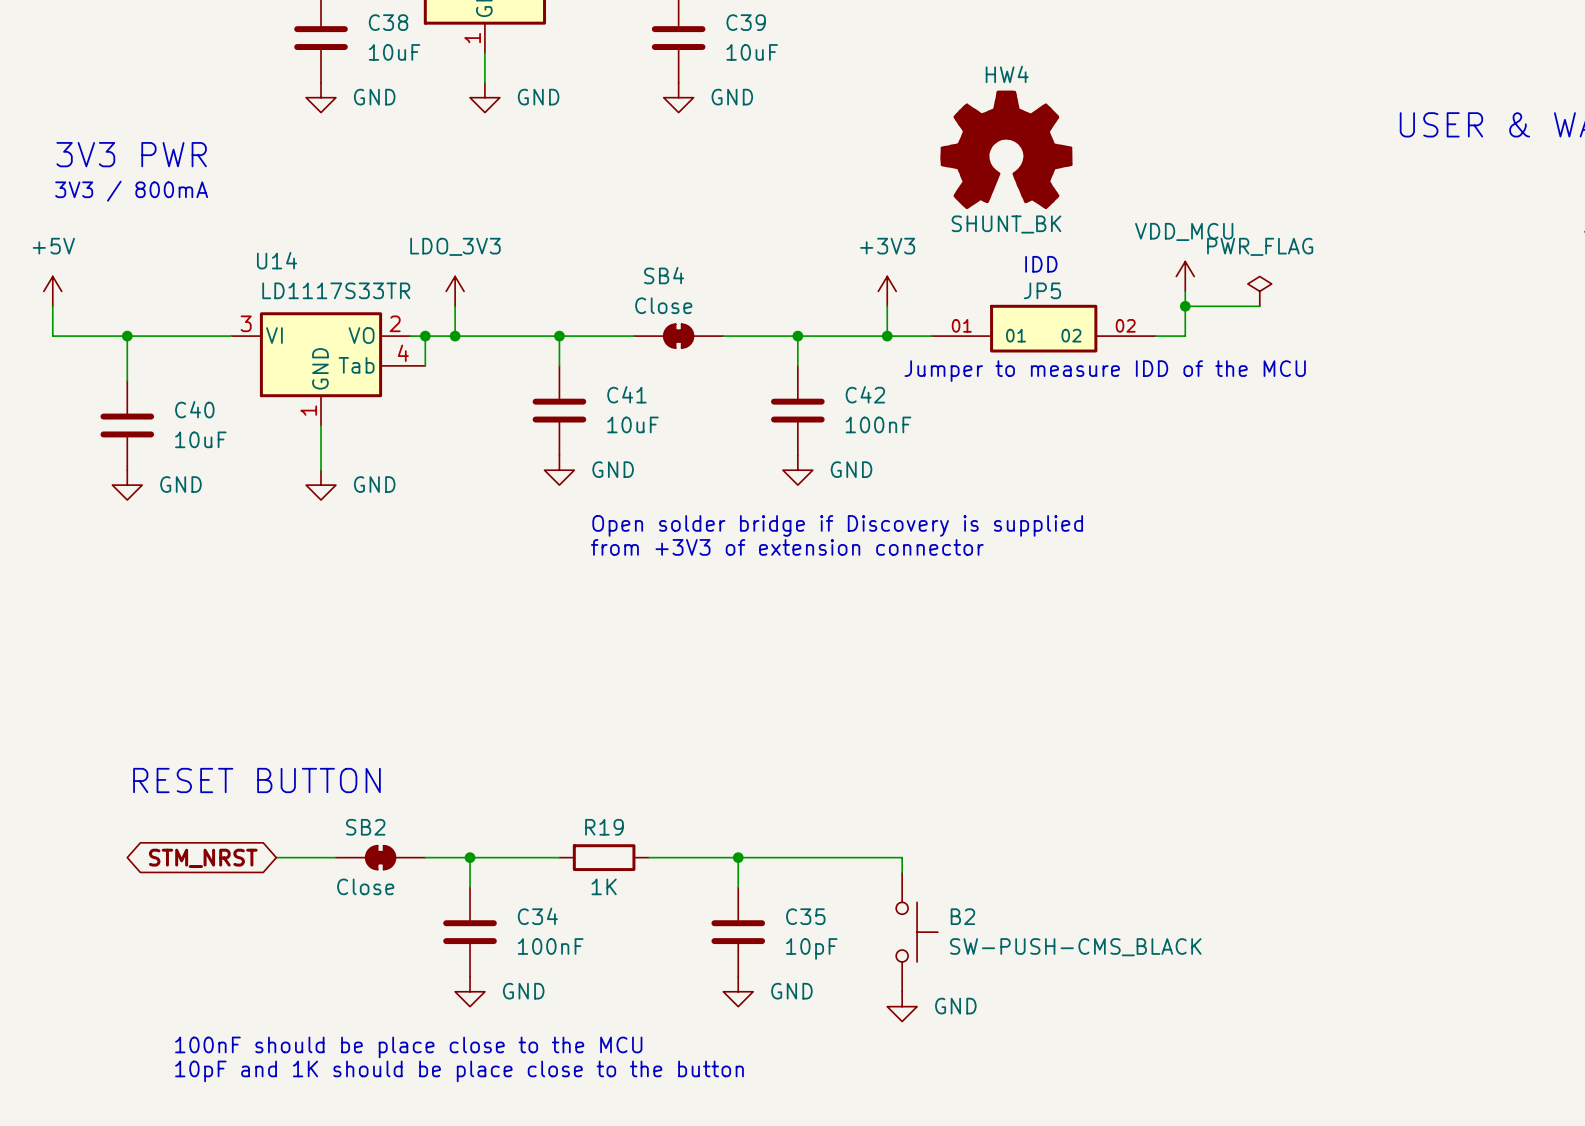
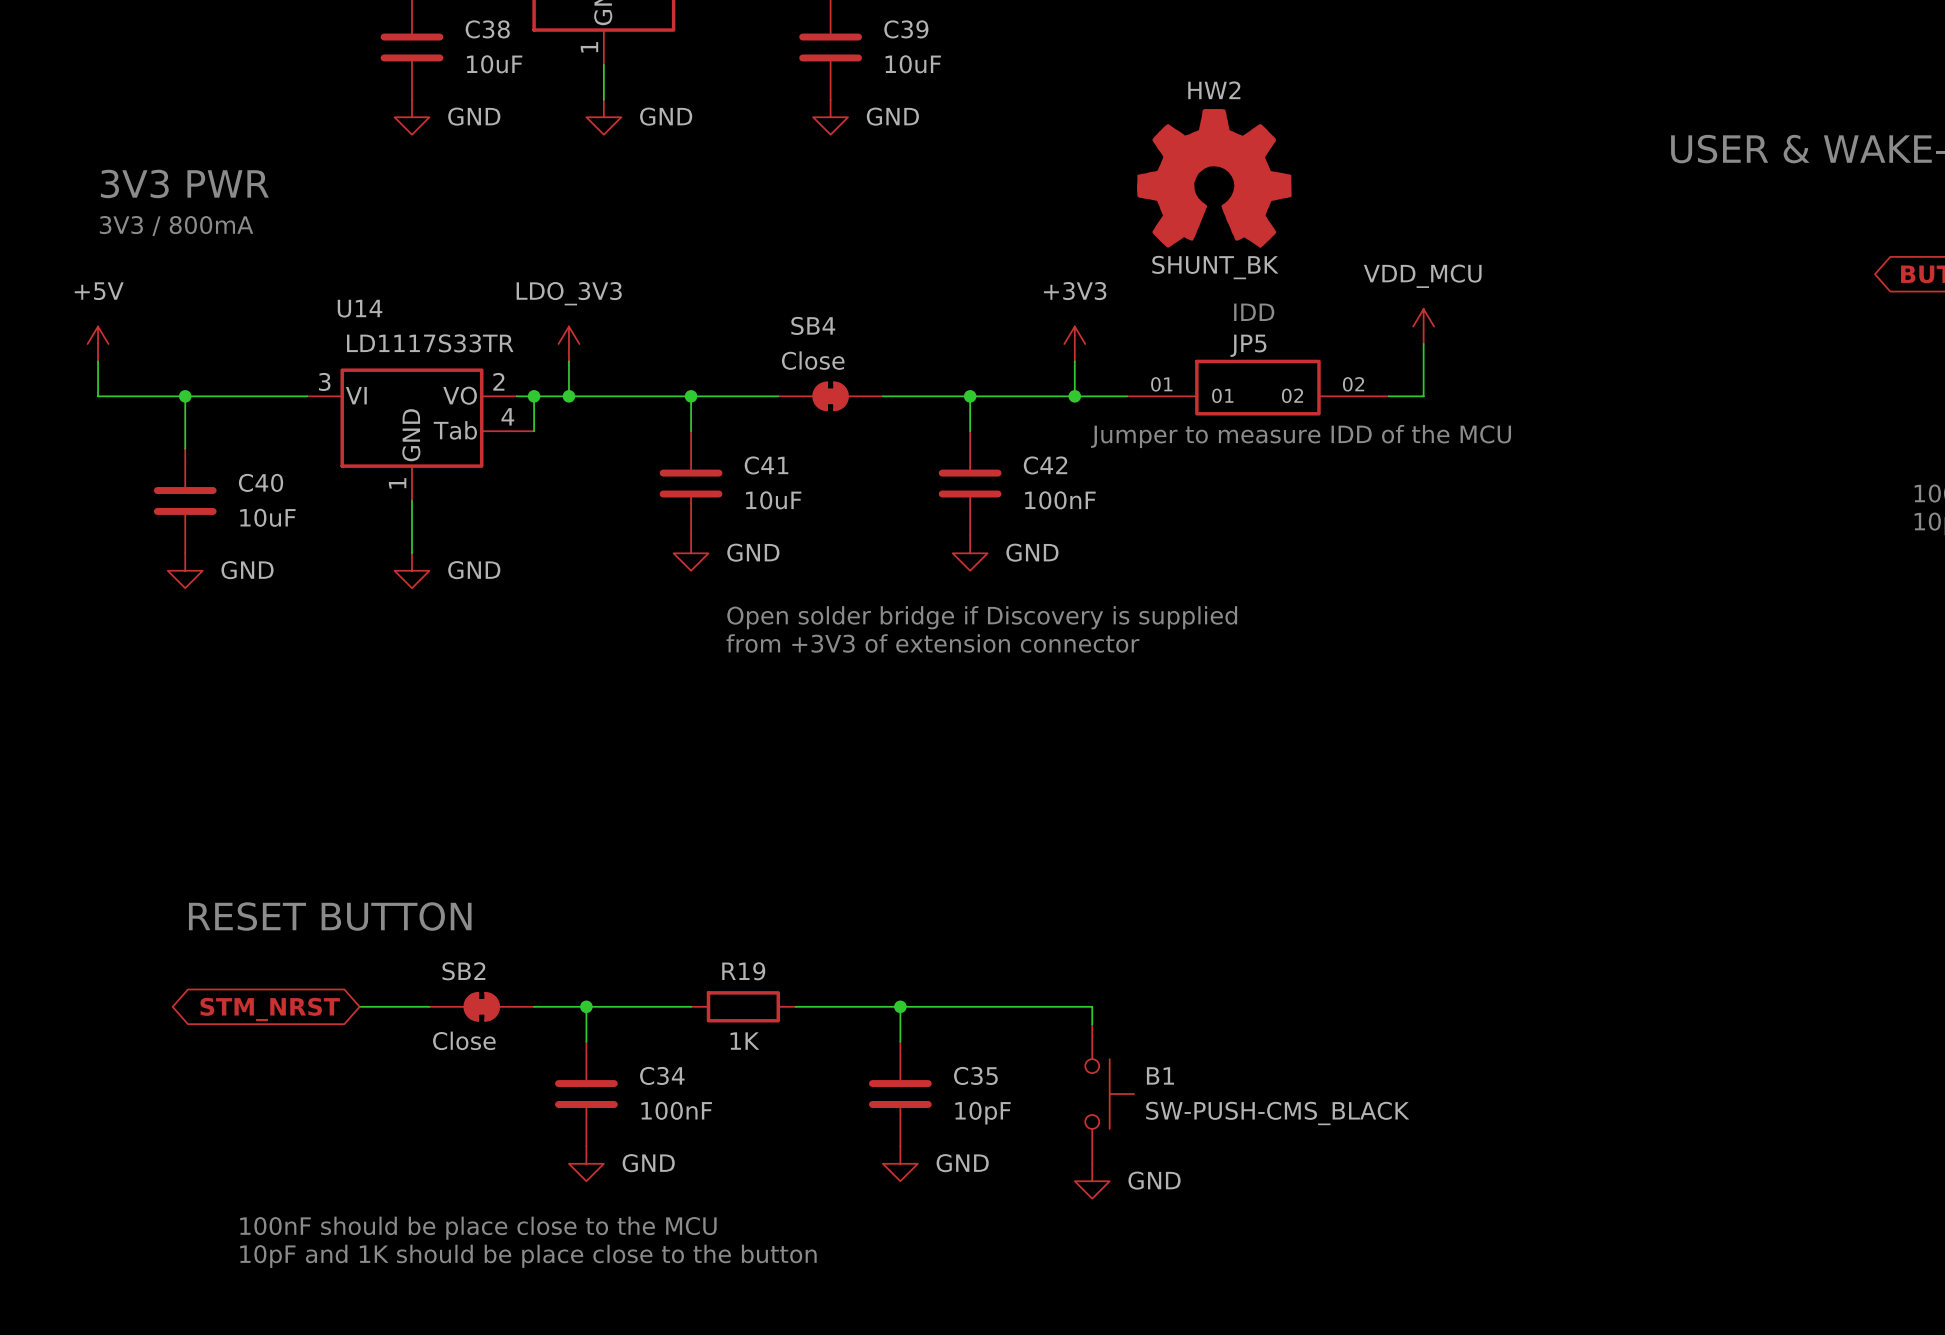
HW4 name: HW4 (1007, 74) -> HW2 (1214, 90)
power symbol: PWR_FLAG (1259, 291) -> none
wire: (1185, 306) (1259, 306) -> none
junction: (1185, 306) -> none
B2 name: B2 (962, 916) -> B1 (1160, 1075)

